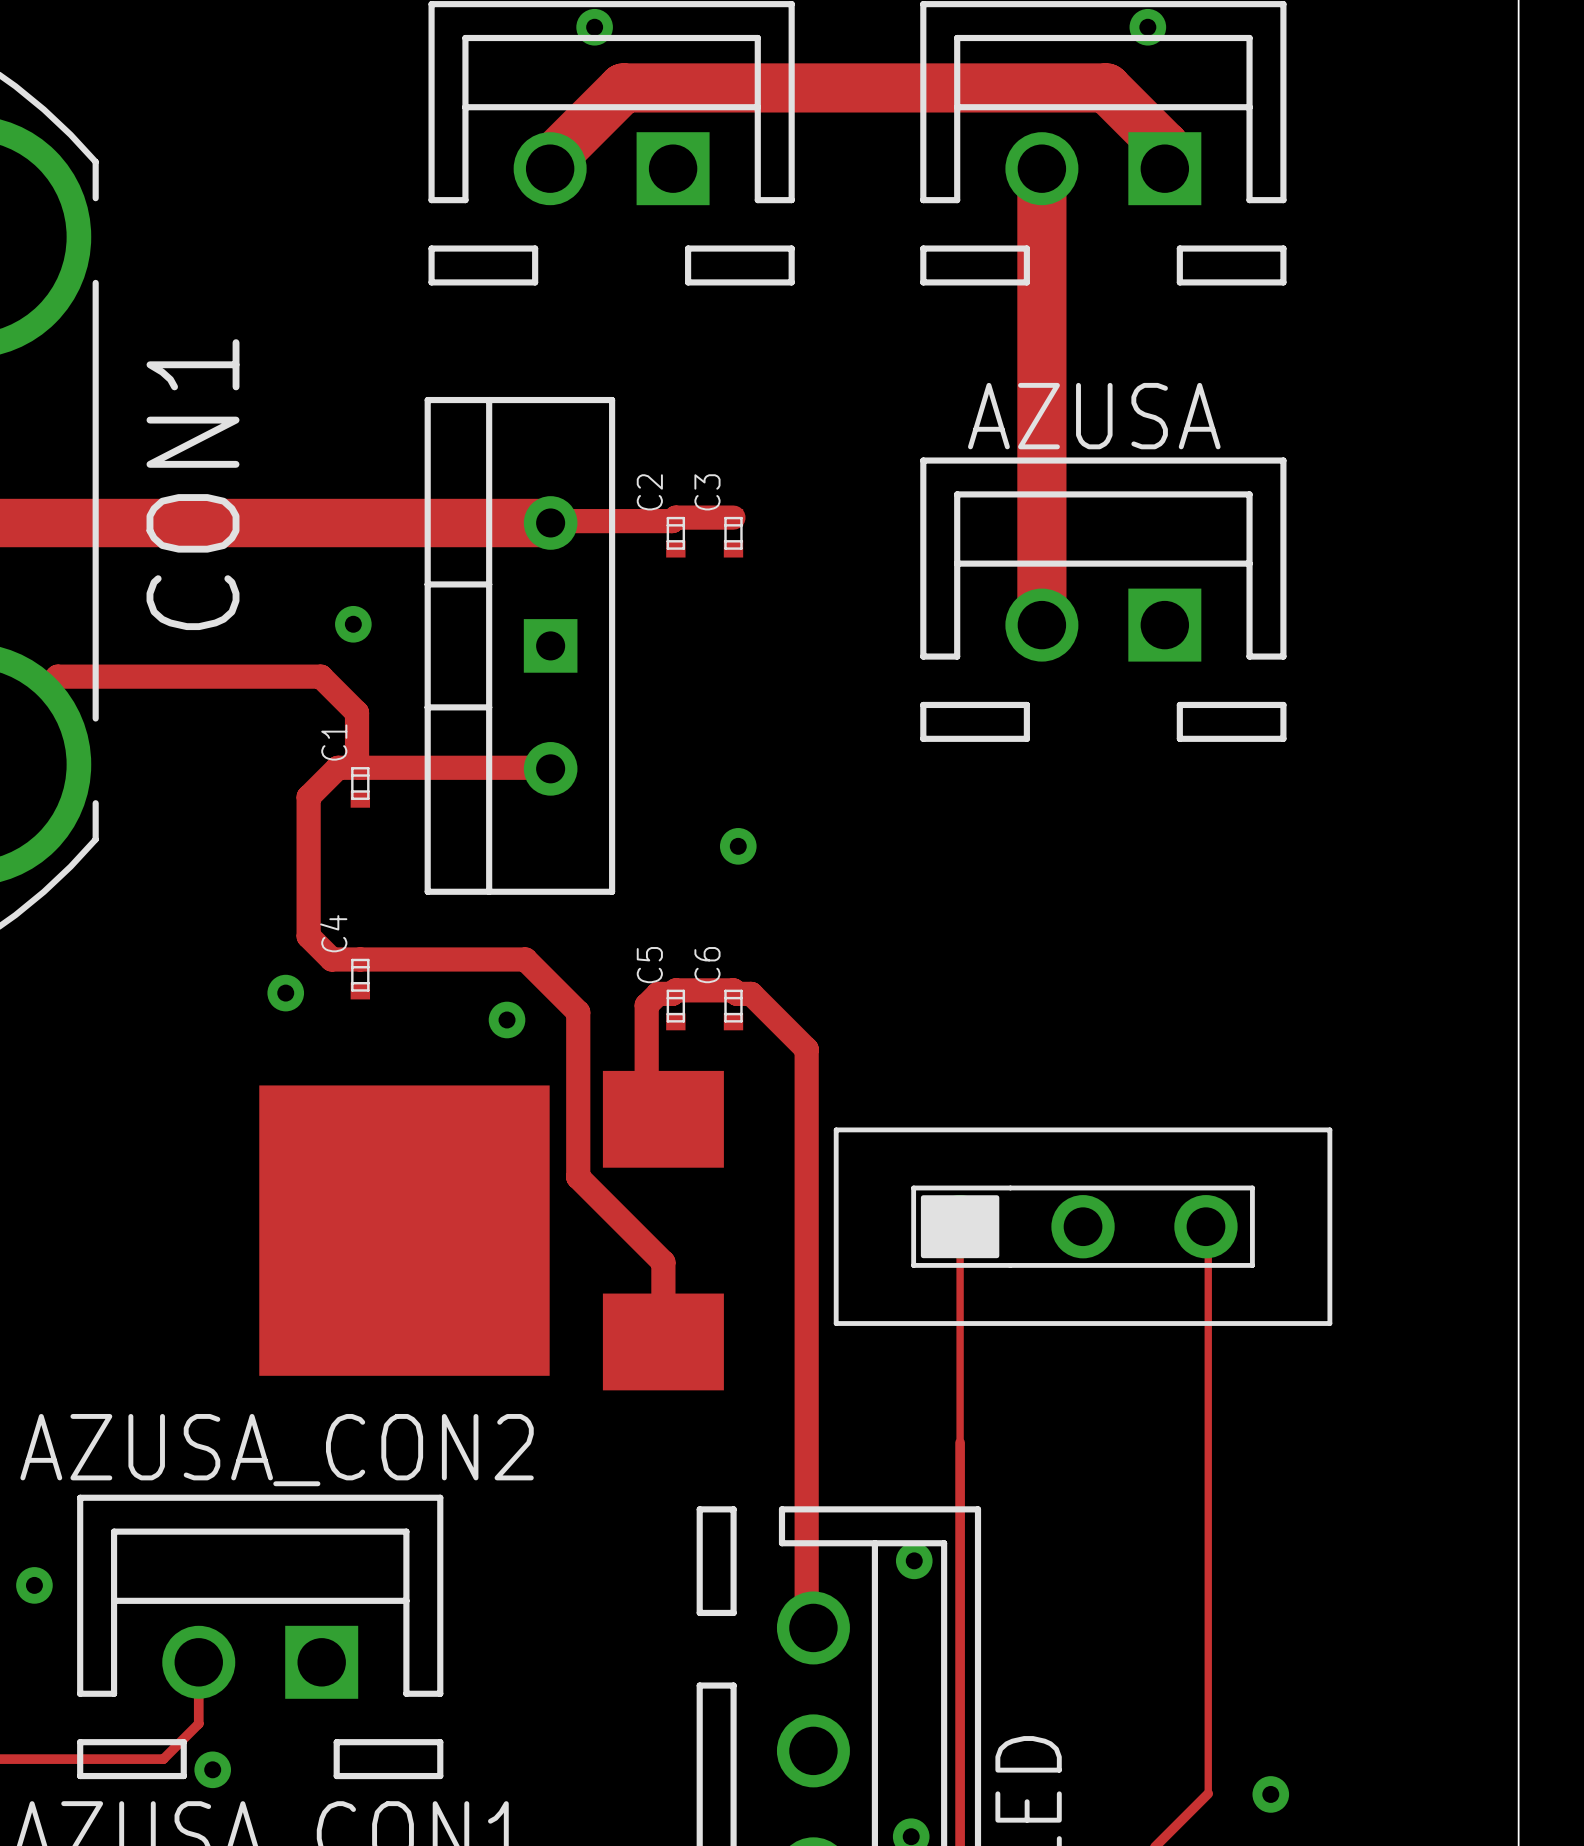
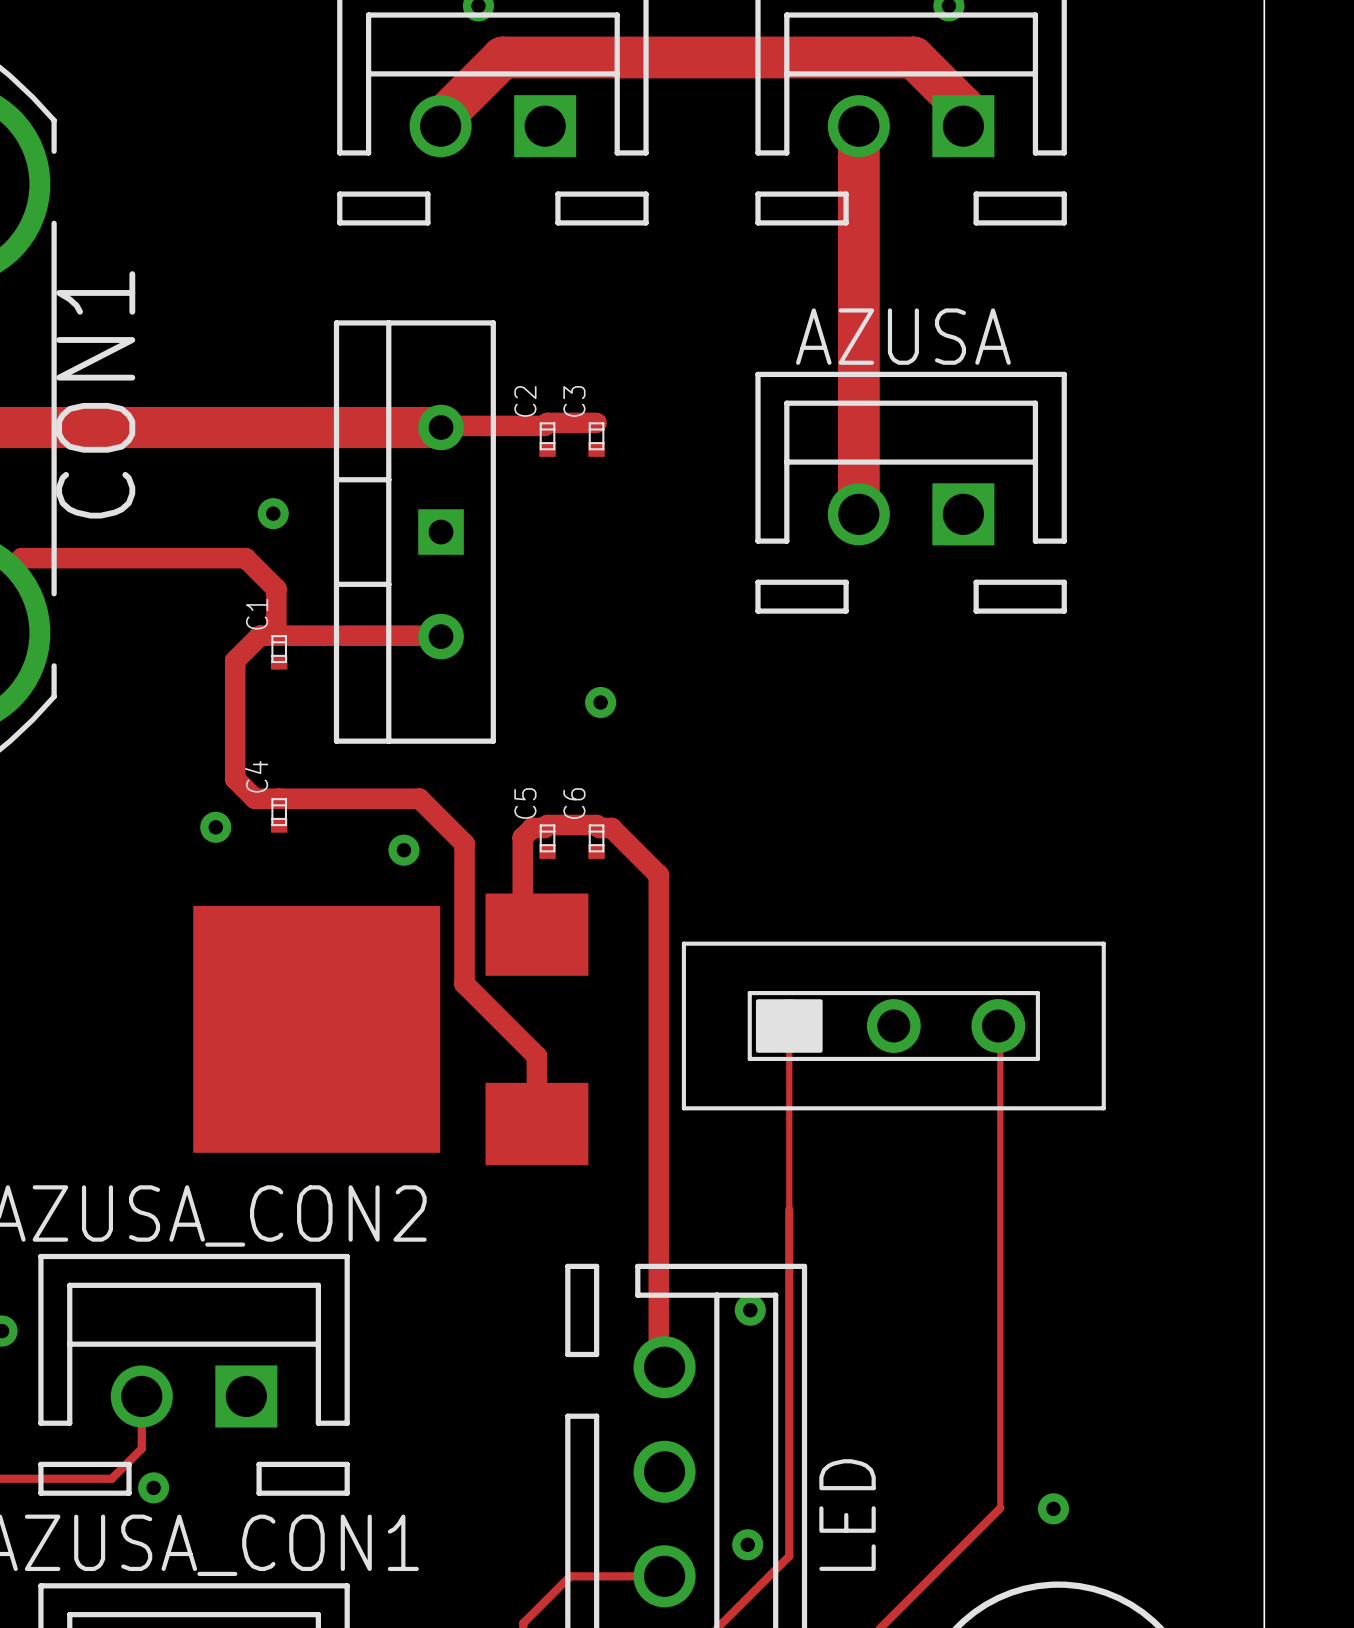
CON1 name position: CON1 (193, 484) -> CON1 (95, 394)

